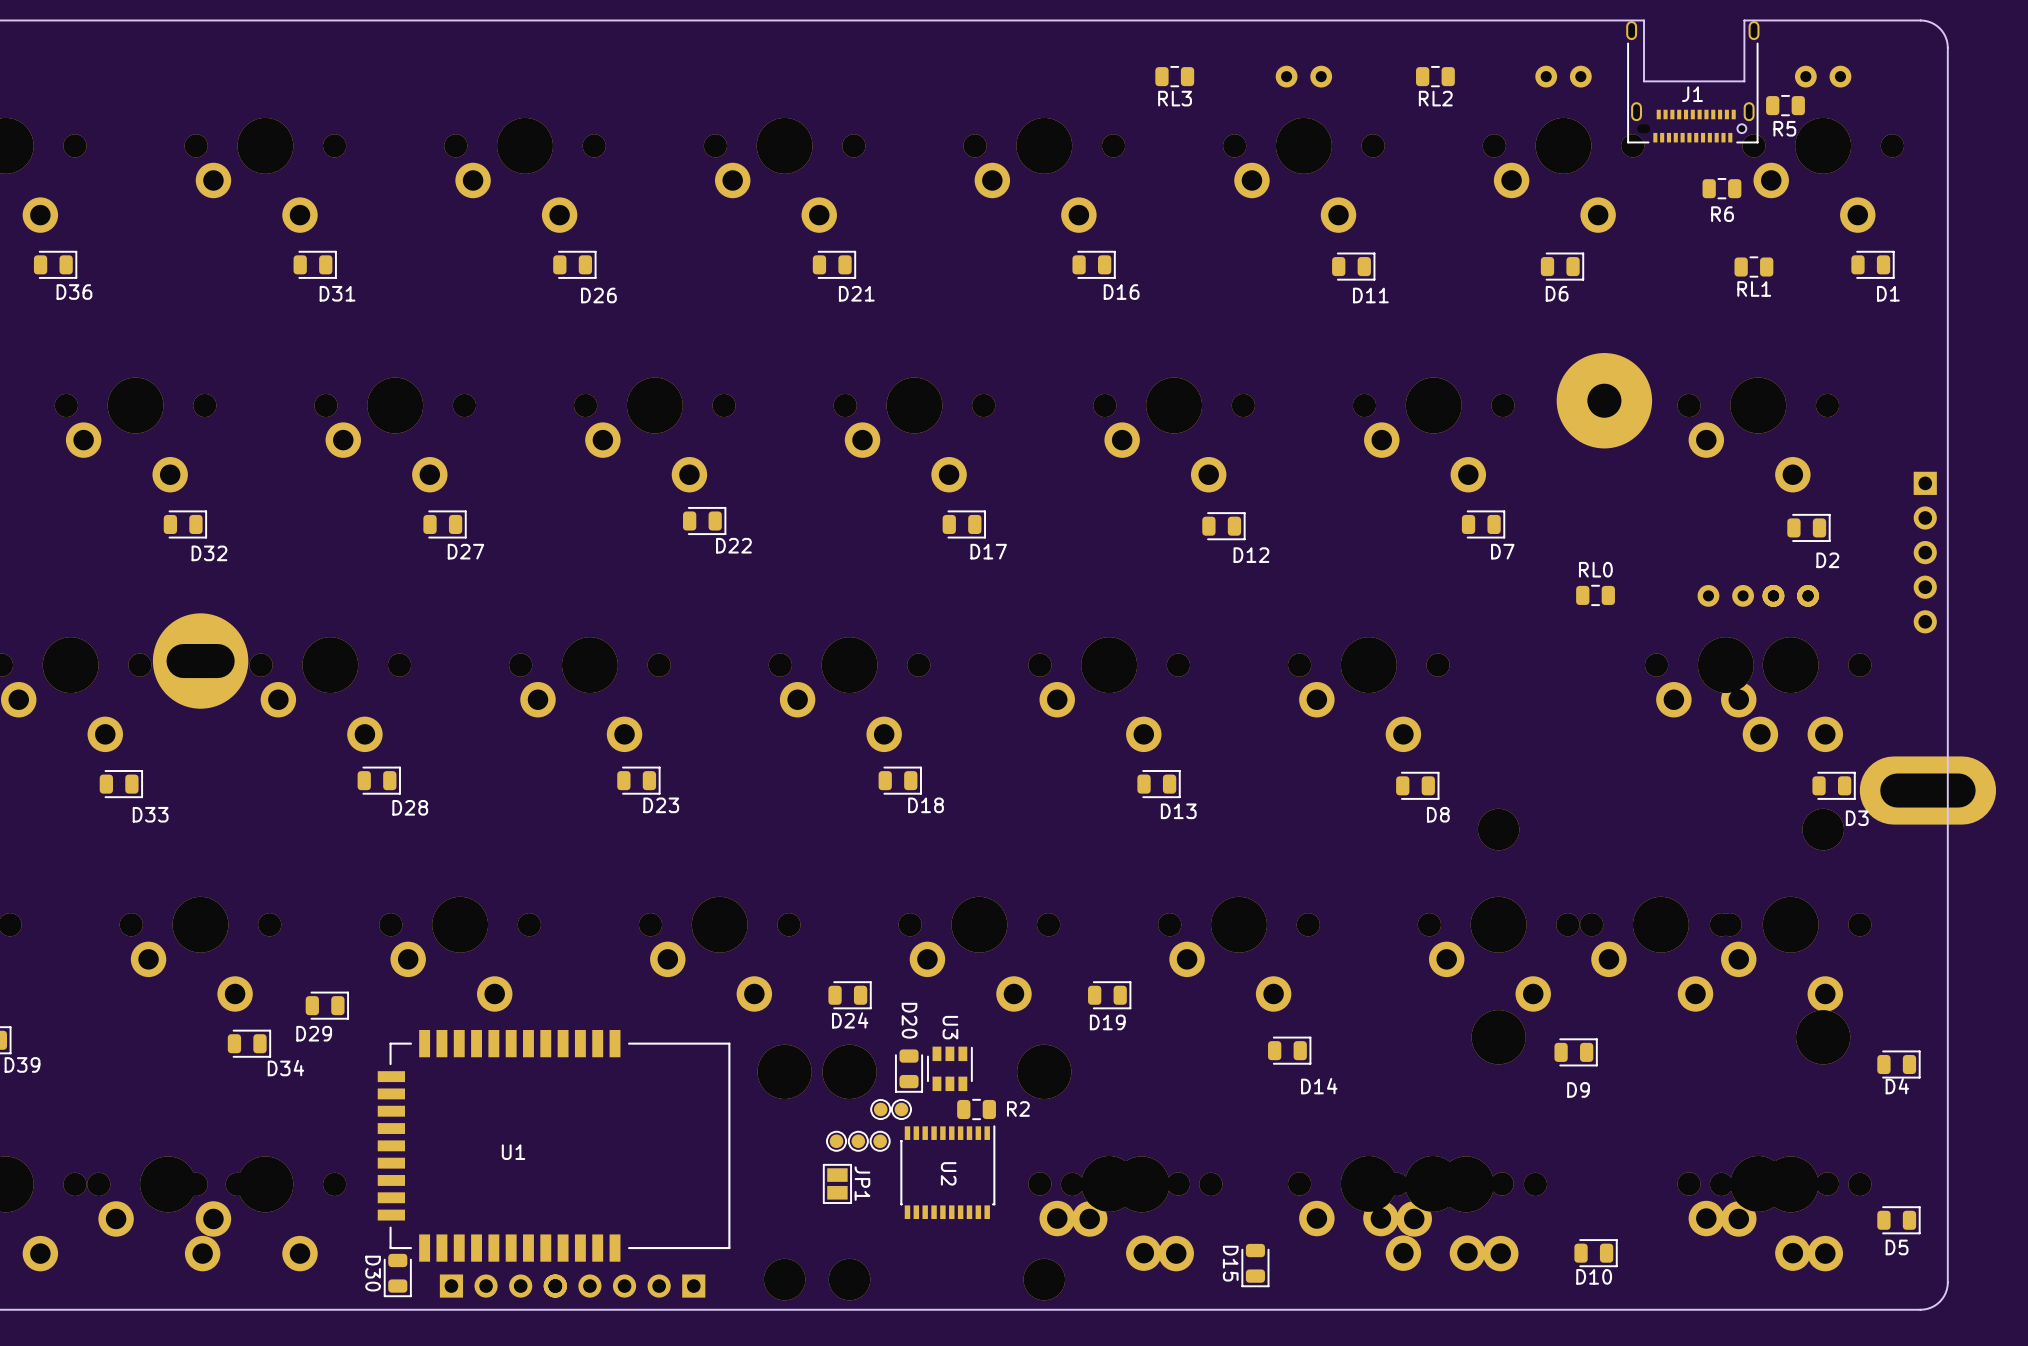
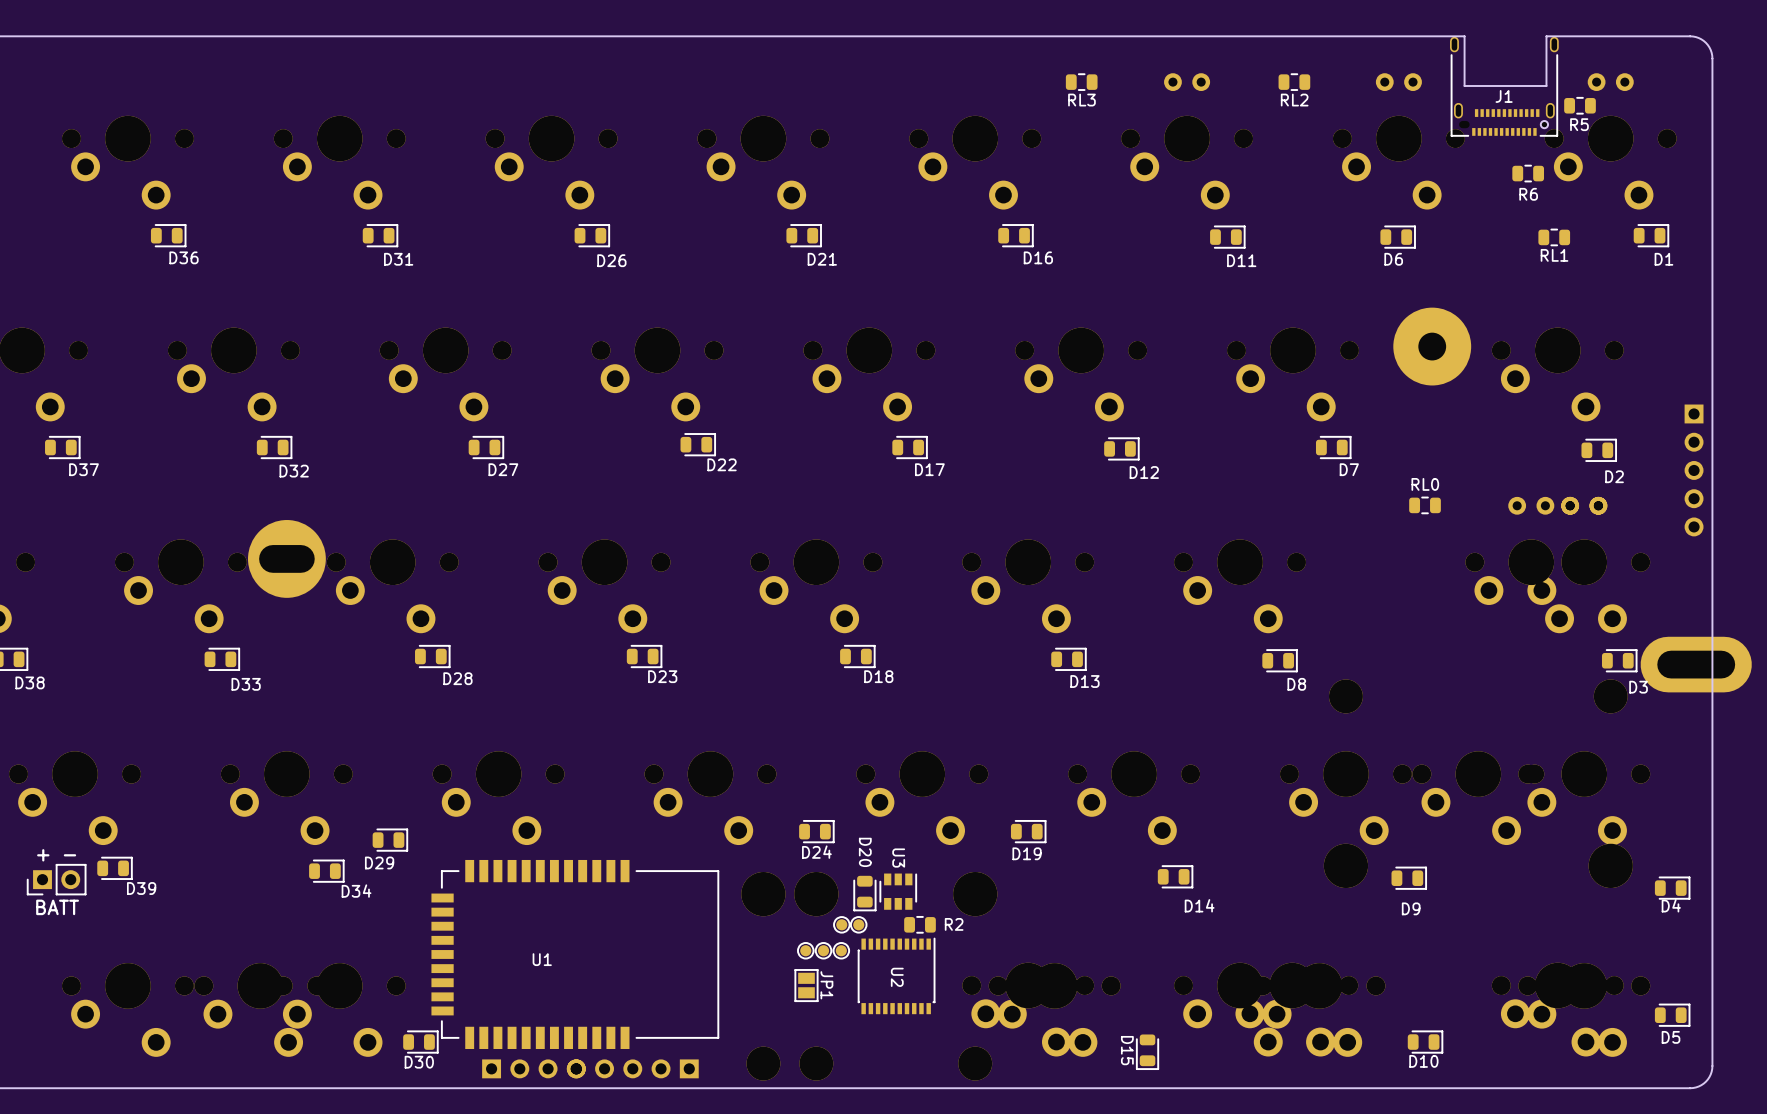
D30 rotation: 0° (397, 1275) -> 90° counterclockwise (420, 1042)
D30 position: (397, 1275) -> (420, 1042)

